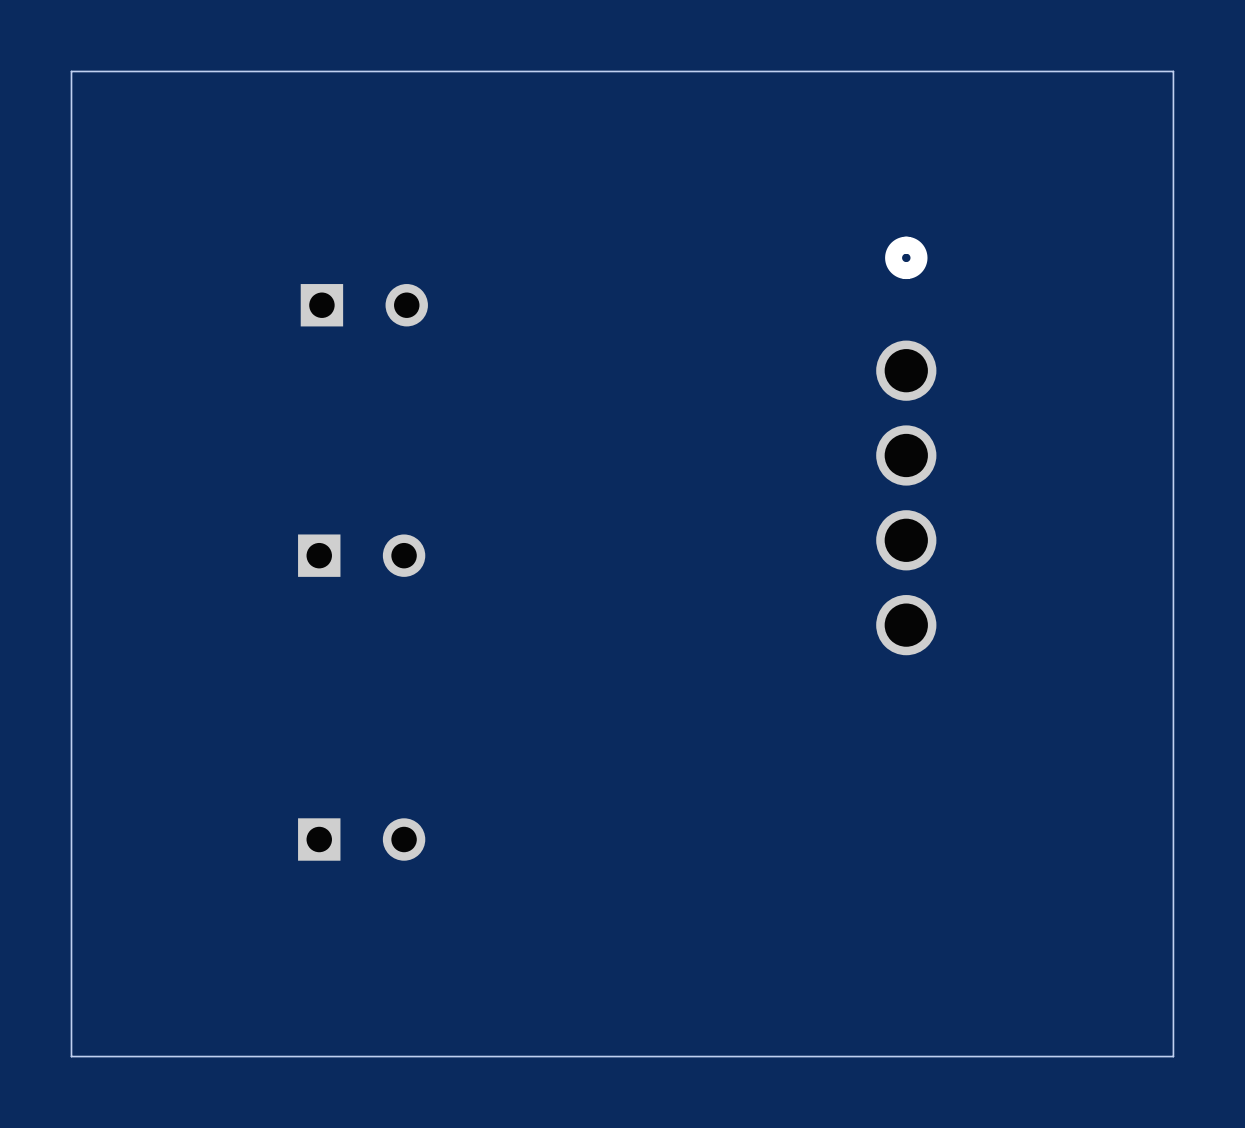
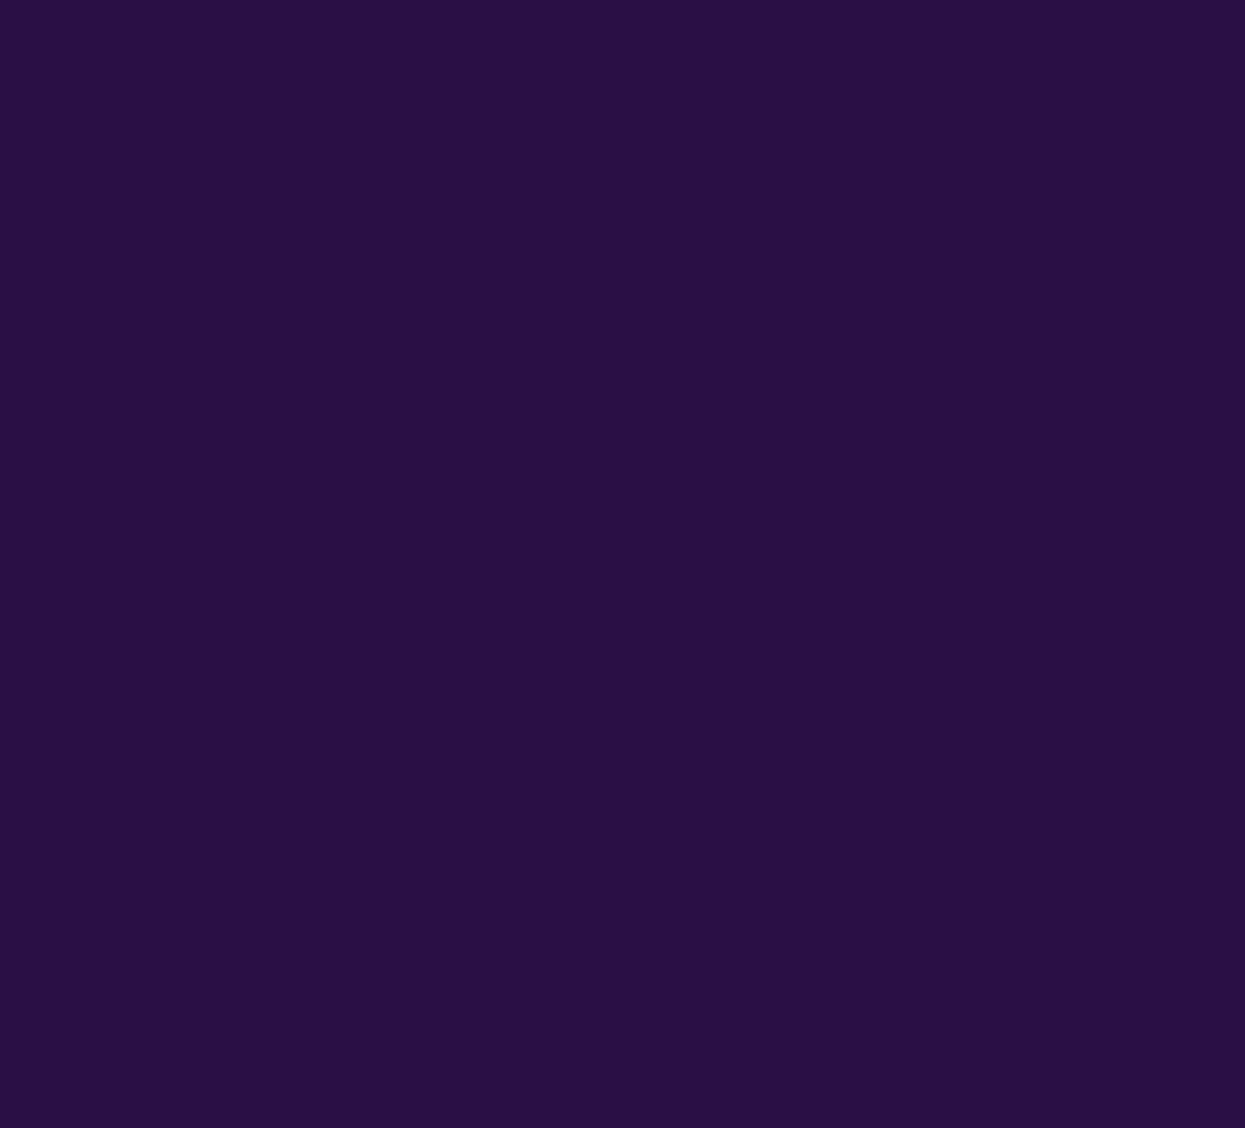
board edge: (1173, 71) (71, 71) (71, 1056) (1173, 1056) (1173, 71) -> none
part: (364, 305) -> none
part: (906, 445) -> none
part: (361, 555) -> none
part: (361, 839) -> none

